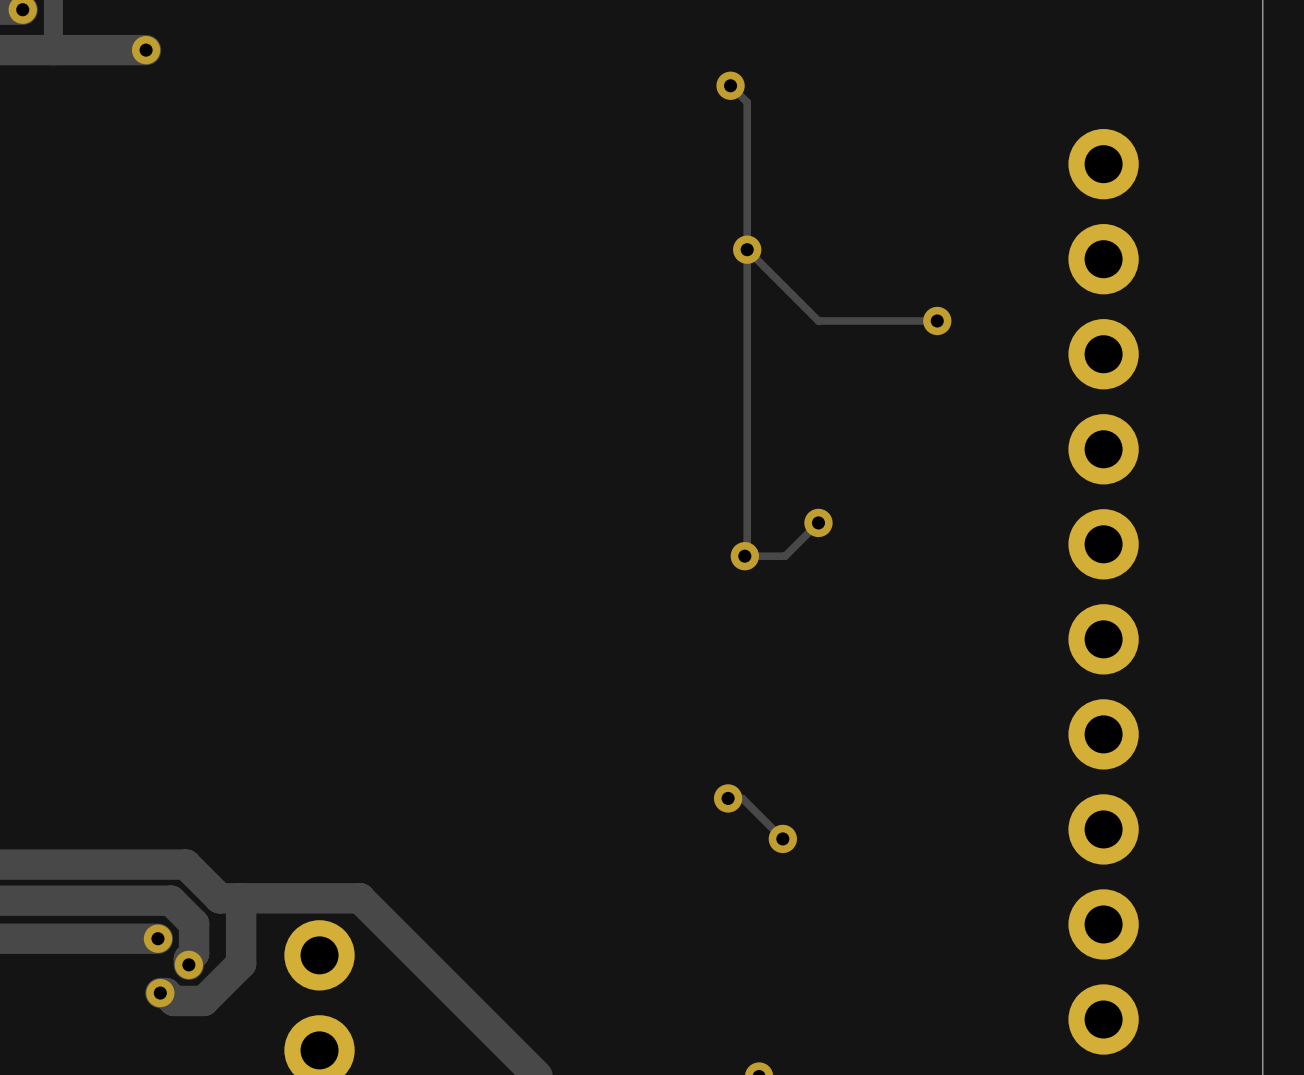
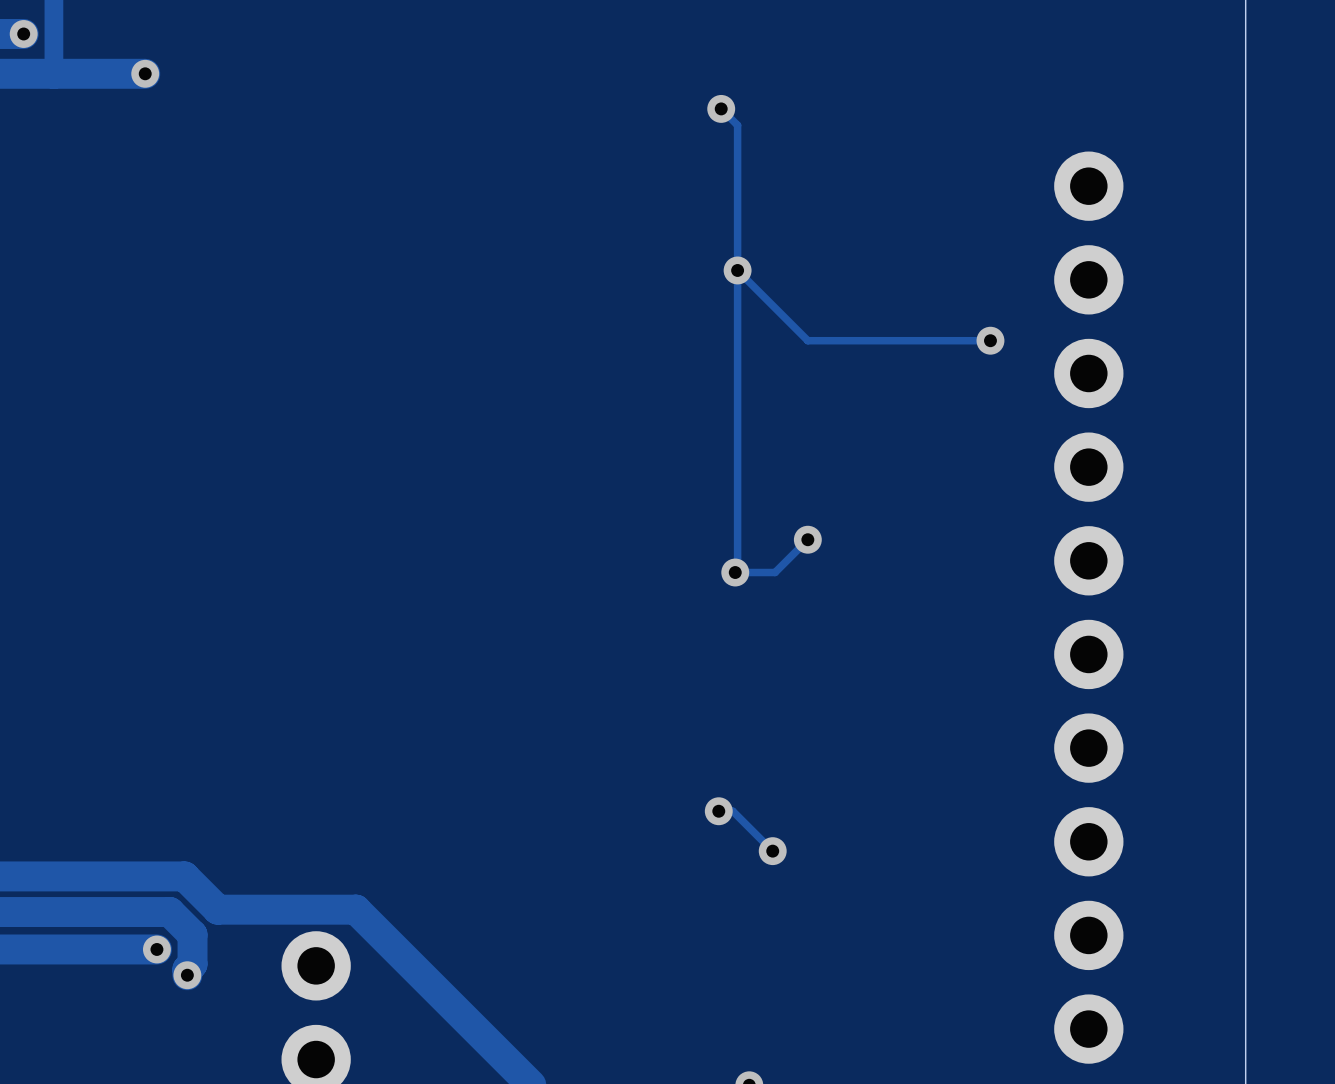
via position: (937, 320) -> (990, 340)
track: none -> (990, 340) (924, 340)
track: (241, 898) (241, 963) (203, 1000) (173, 1000) (165, 993) (160, 993) -> none
via: (160, 993) -> none

